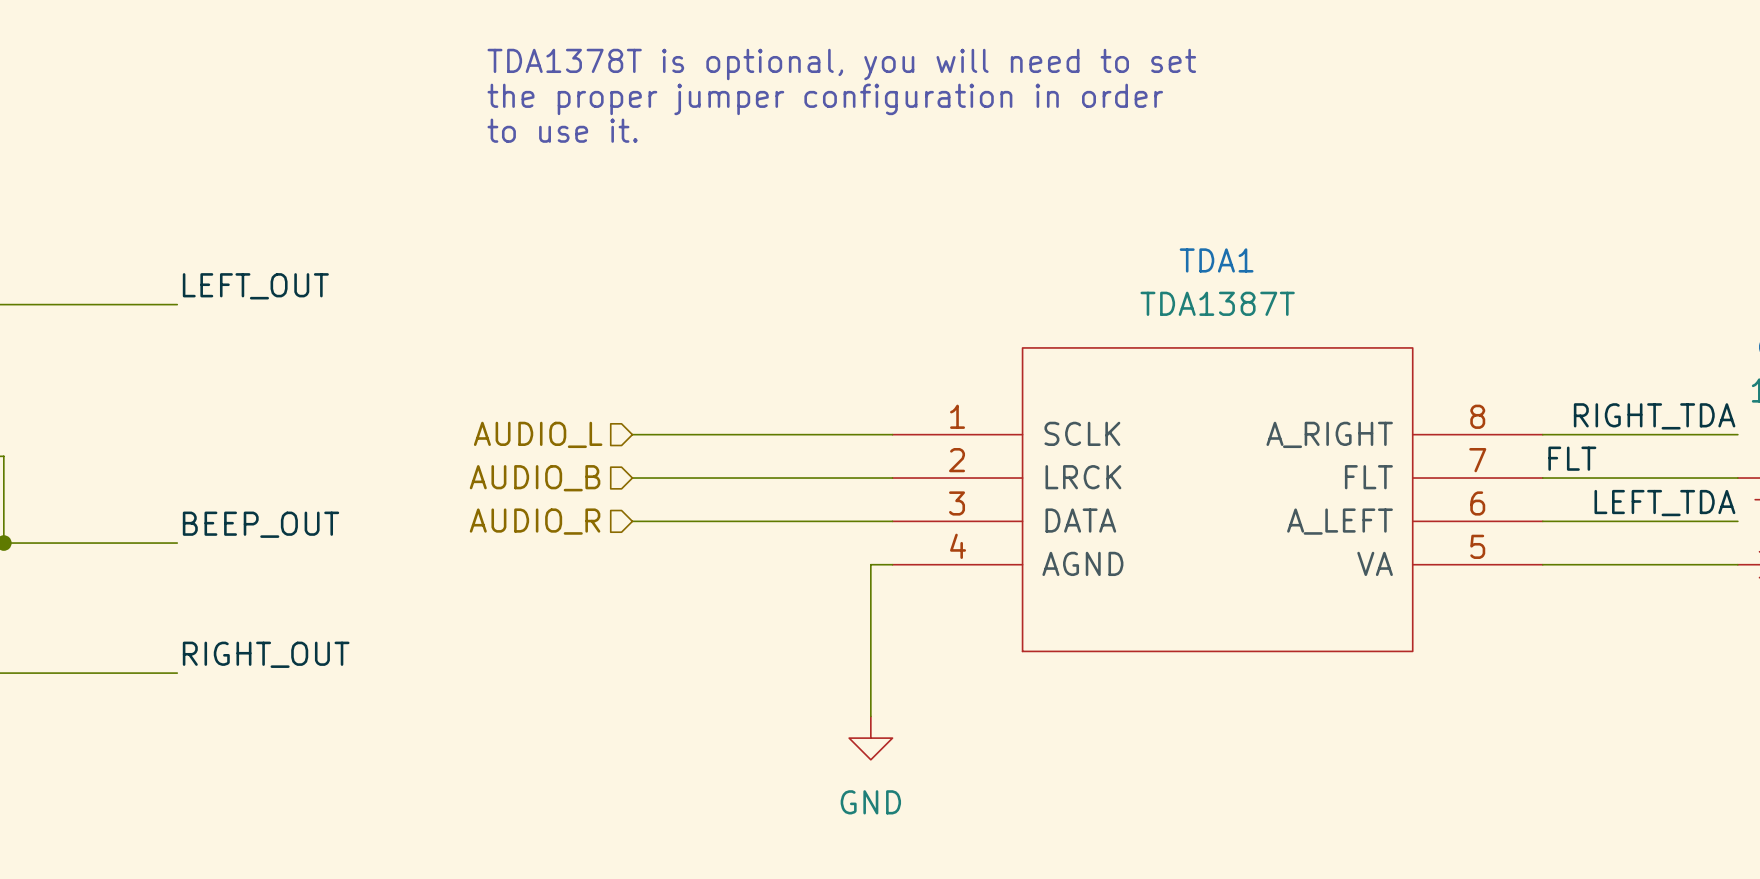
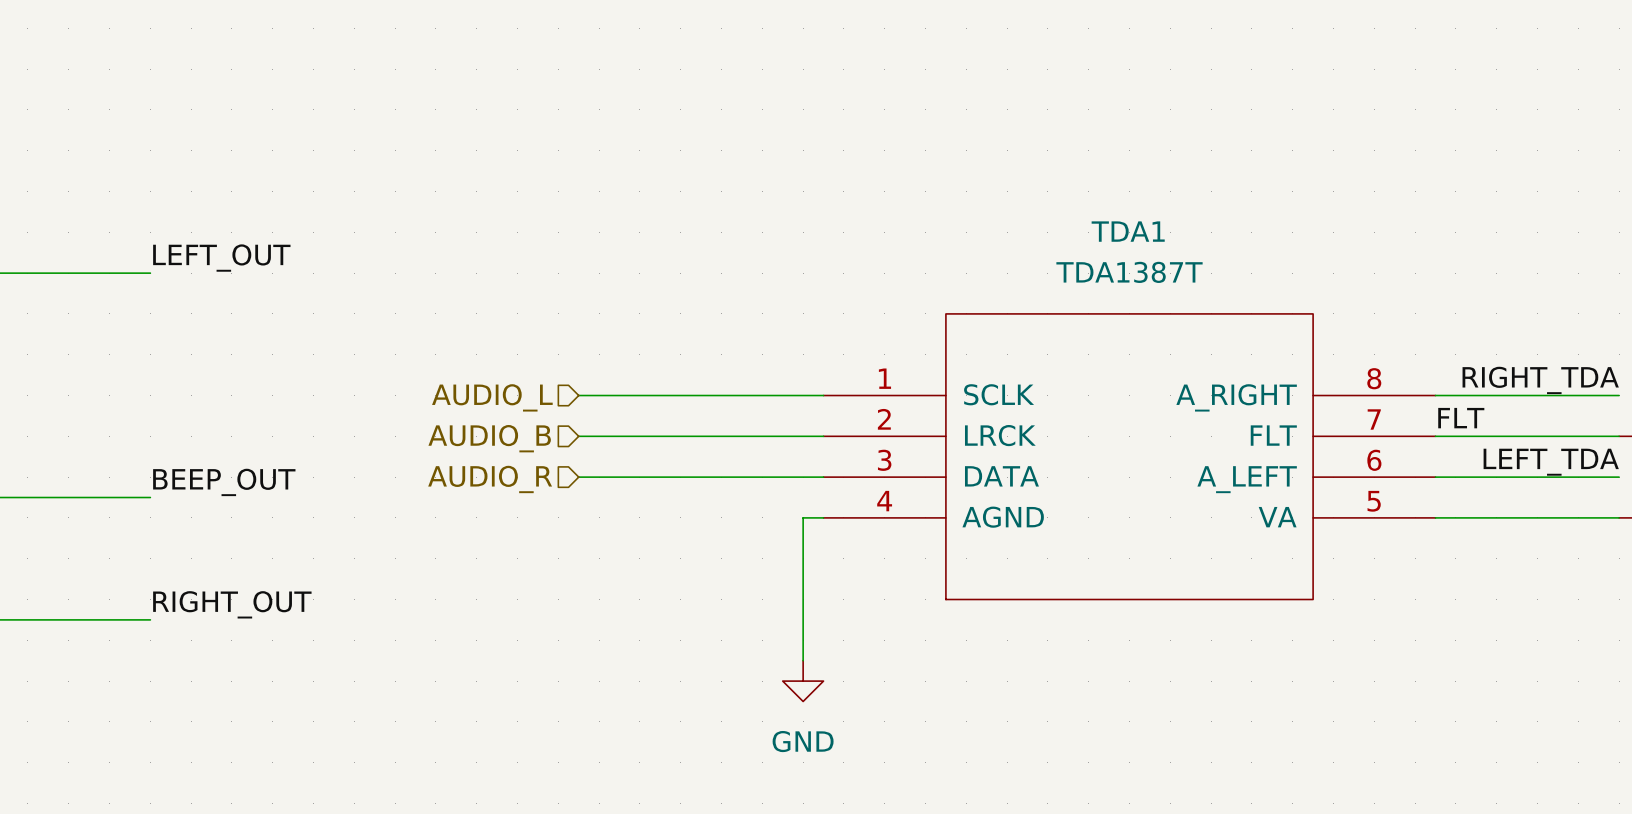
text: TDA1378T is optional, you will need to set (841, 64) -> none
text: the proper jumper configuration in order (825, 99) -> none
text: to use it. (562, 130) -> none

